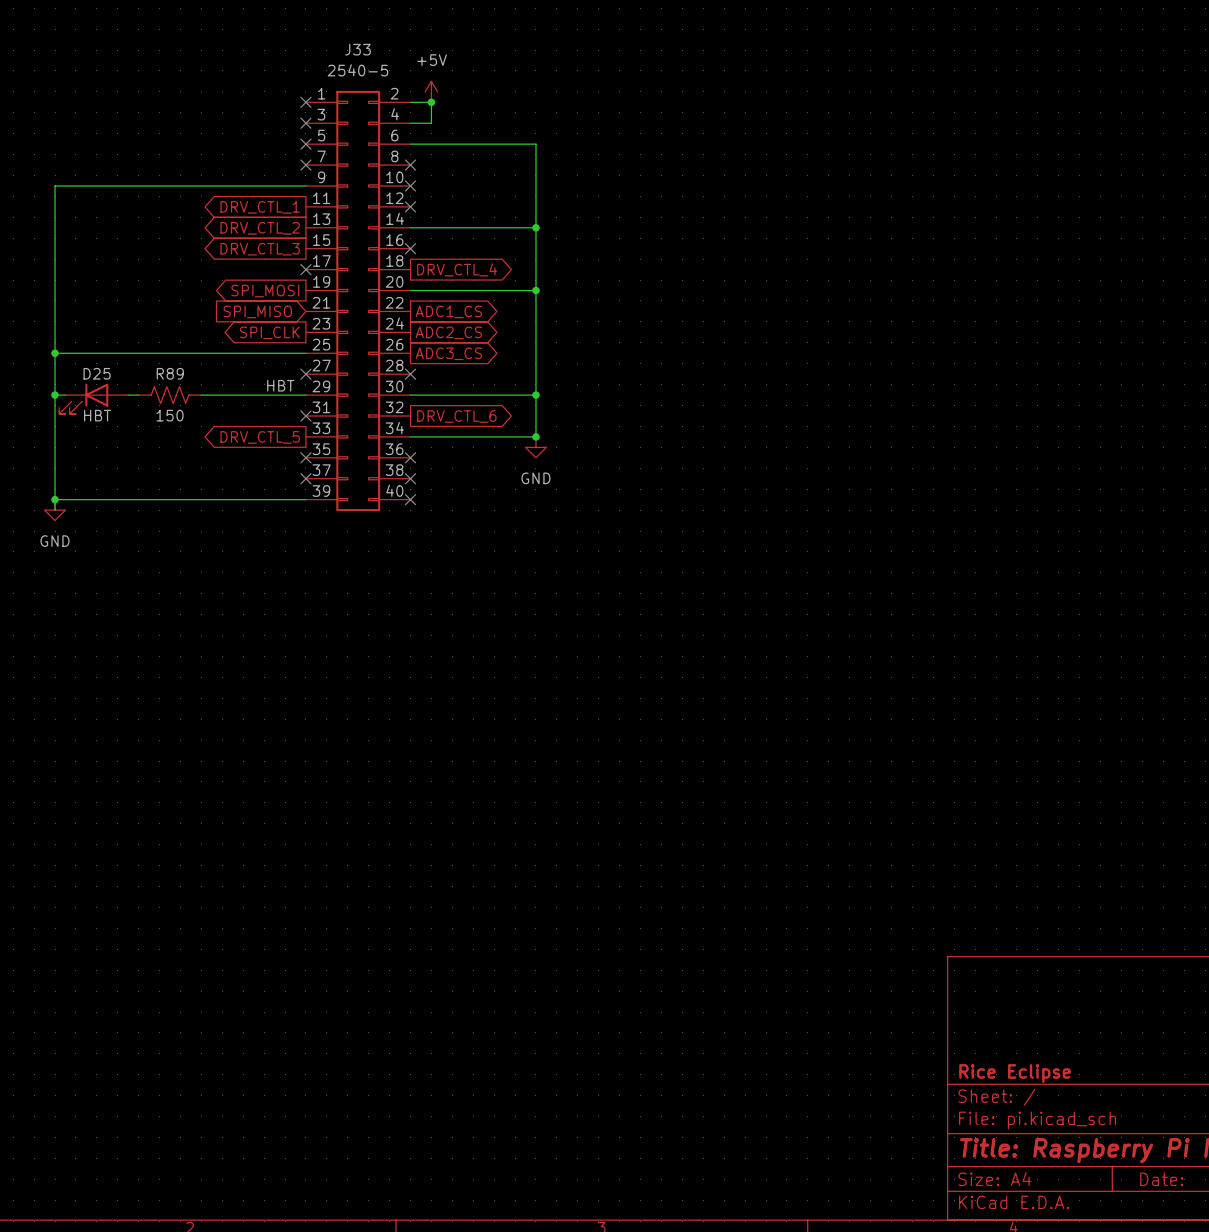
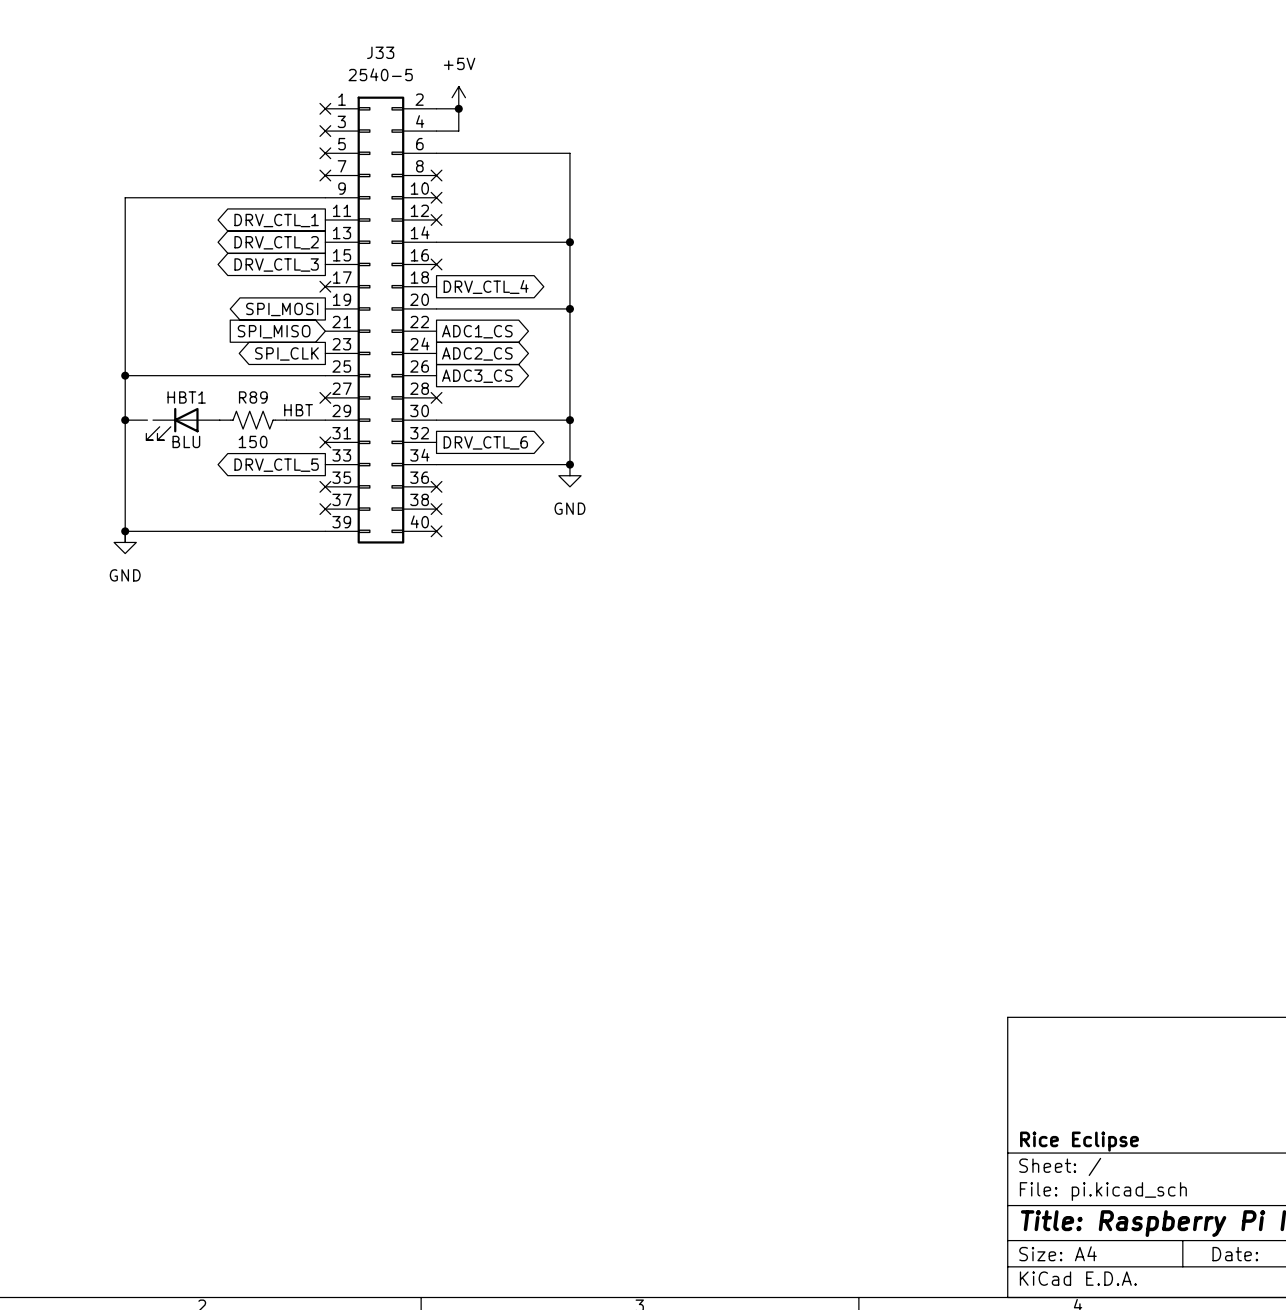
wire: (117, 185) (55, 185) (55, 510) -> (125, 197) (125, 542)
wire: (55, 353) (117, 353) -> none
junction: (55, 353) -> none
junction: none -> (125, 375)
junction: (55, 395) -> none
junction: none -> (125, 420)
R89 position: (170, 395) -> (253, 420)
D25: HBT (93, 398) -> none
HBT1: none -> BLU (183, 424)
wire: (55, 499) (117, 499) -> none
junction: (55, 499) -> none
junction: none -> (125, 531)
power symbol position: GND (55, 510) -> GND (125, 542)

